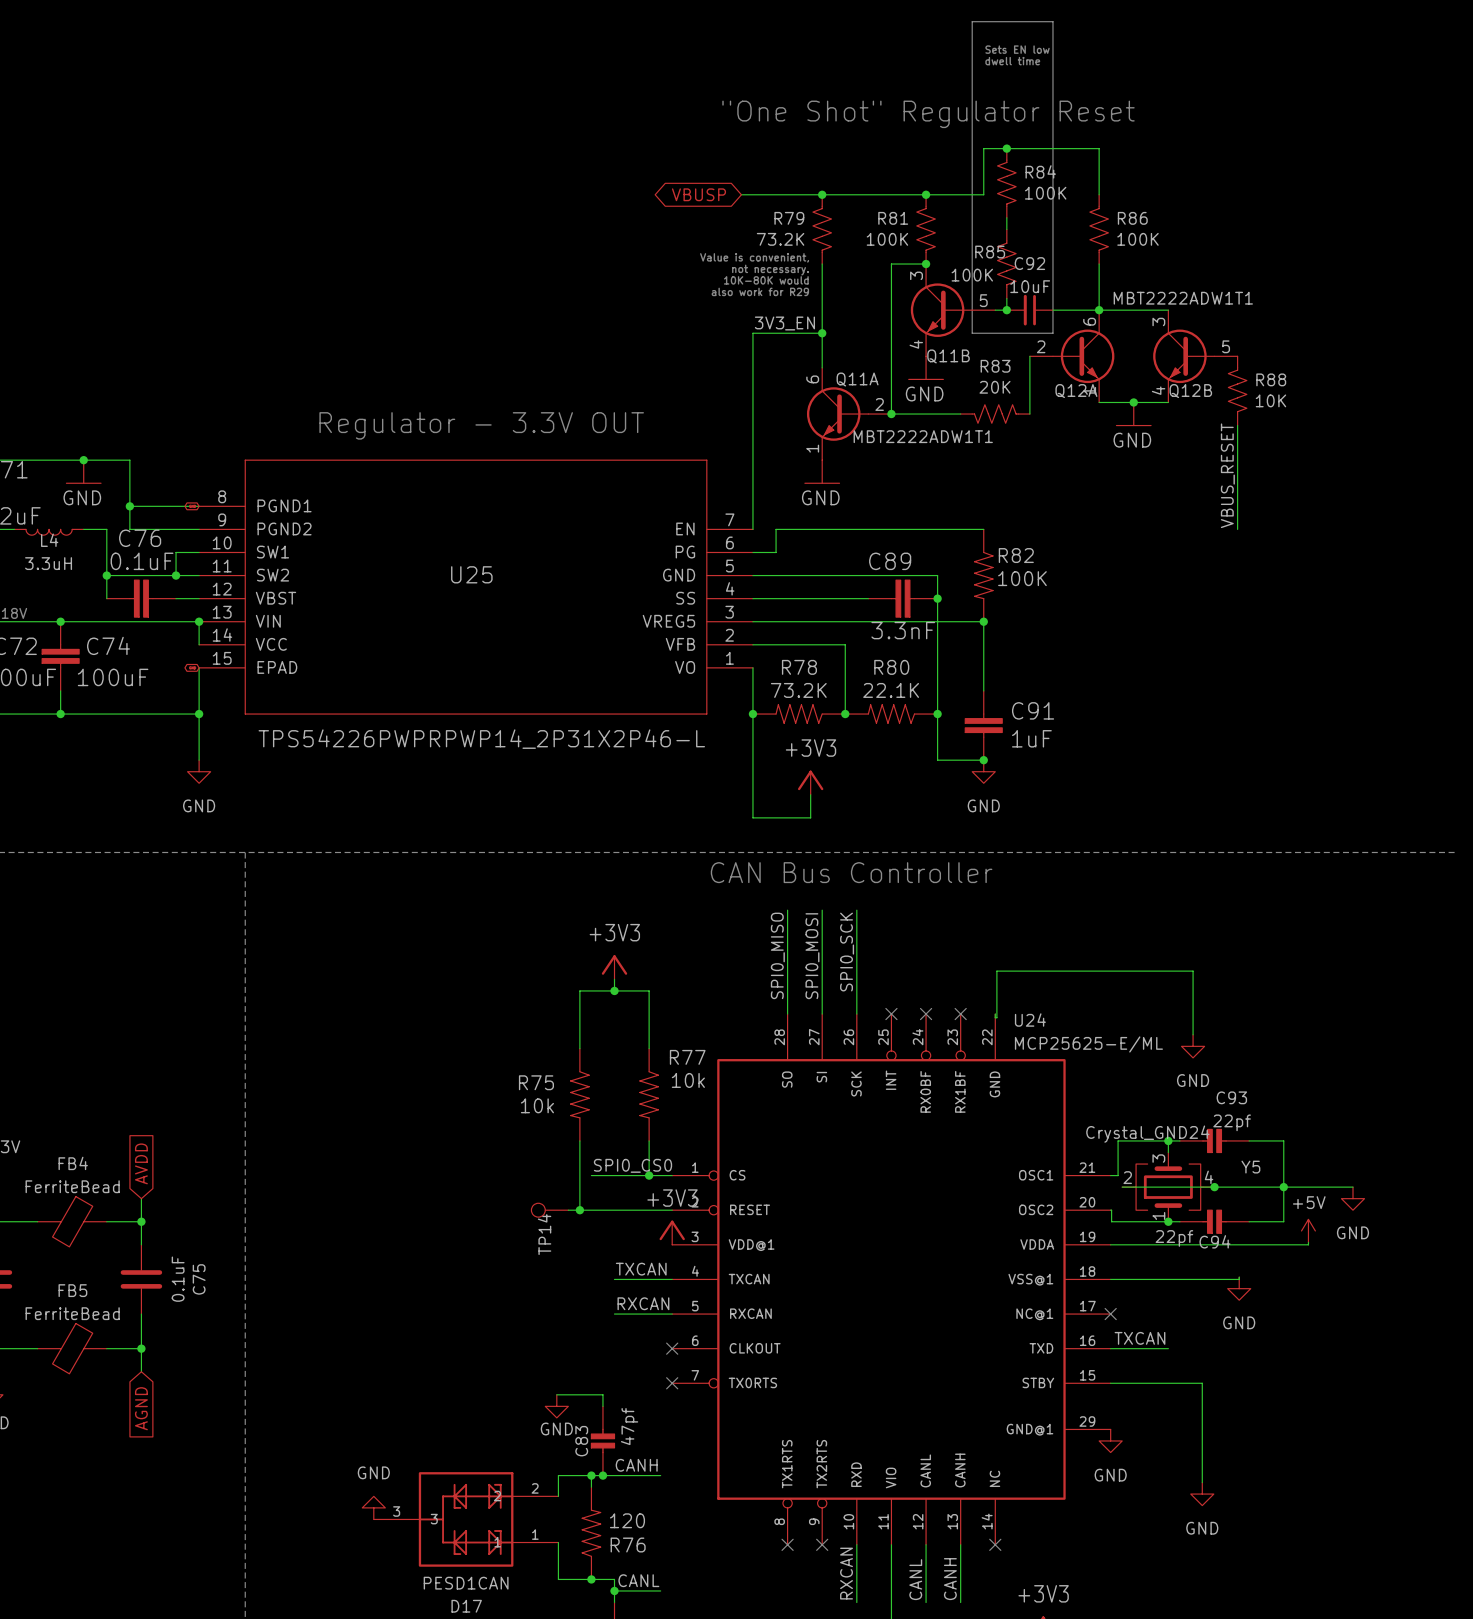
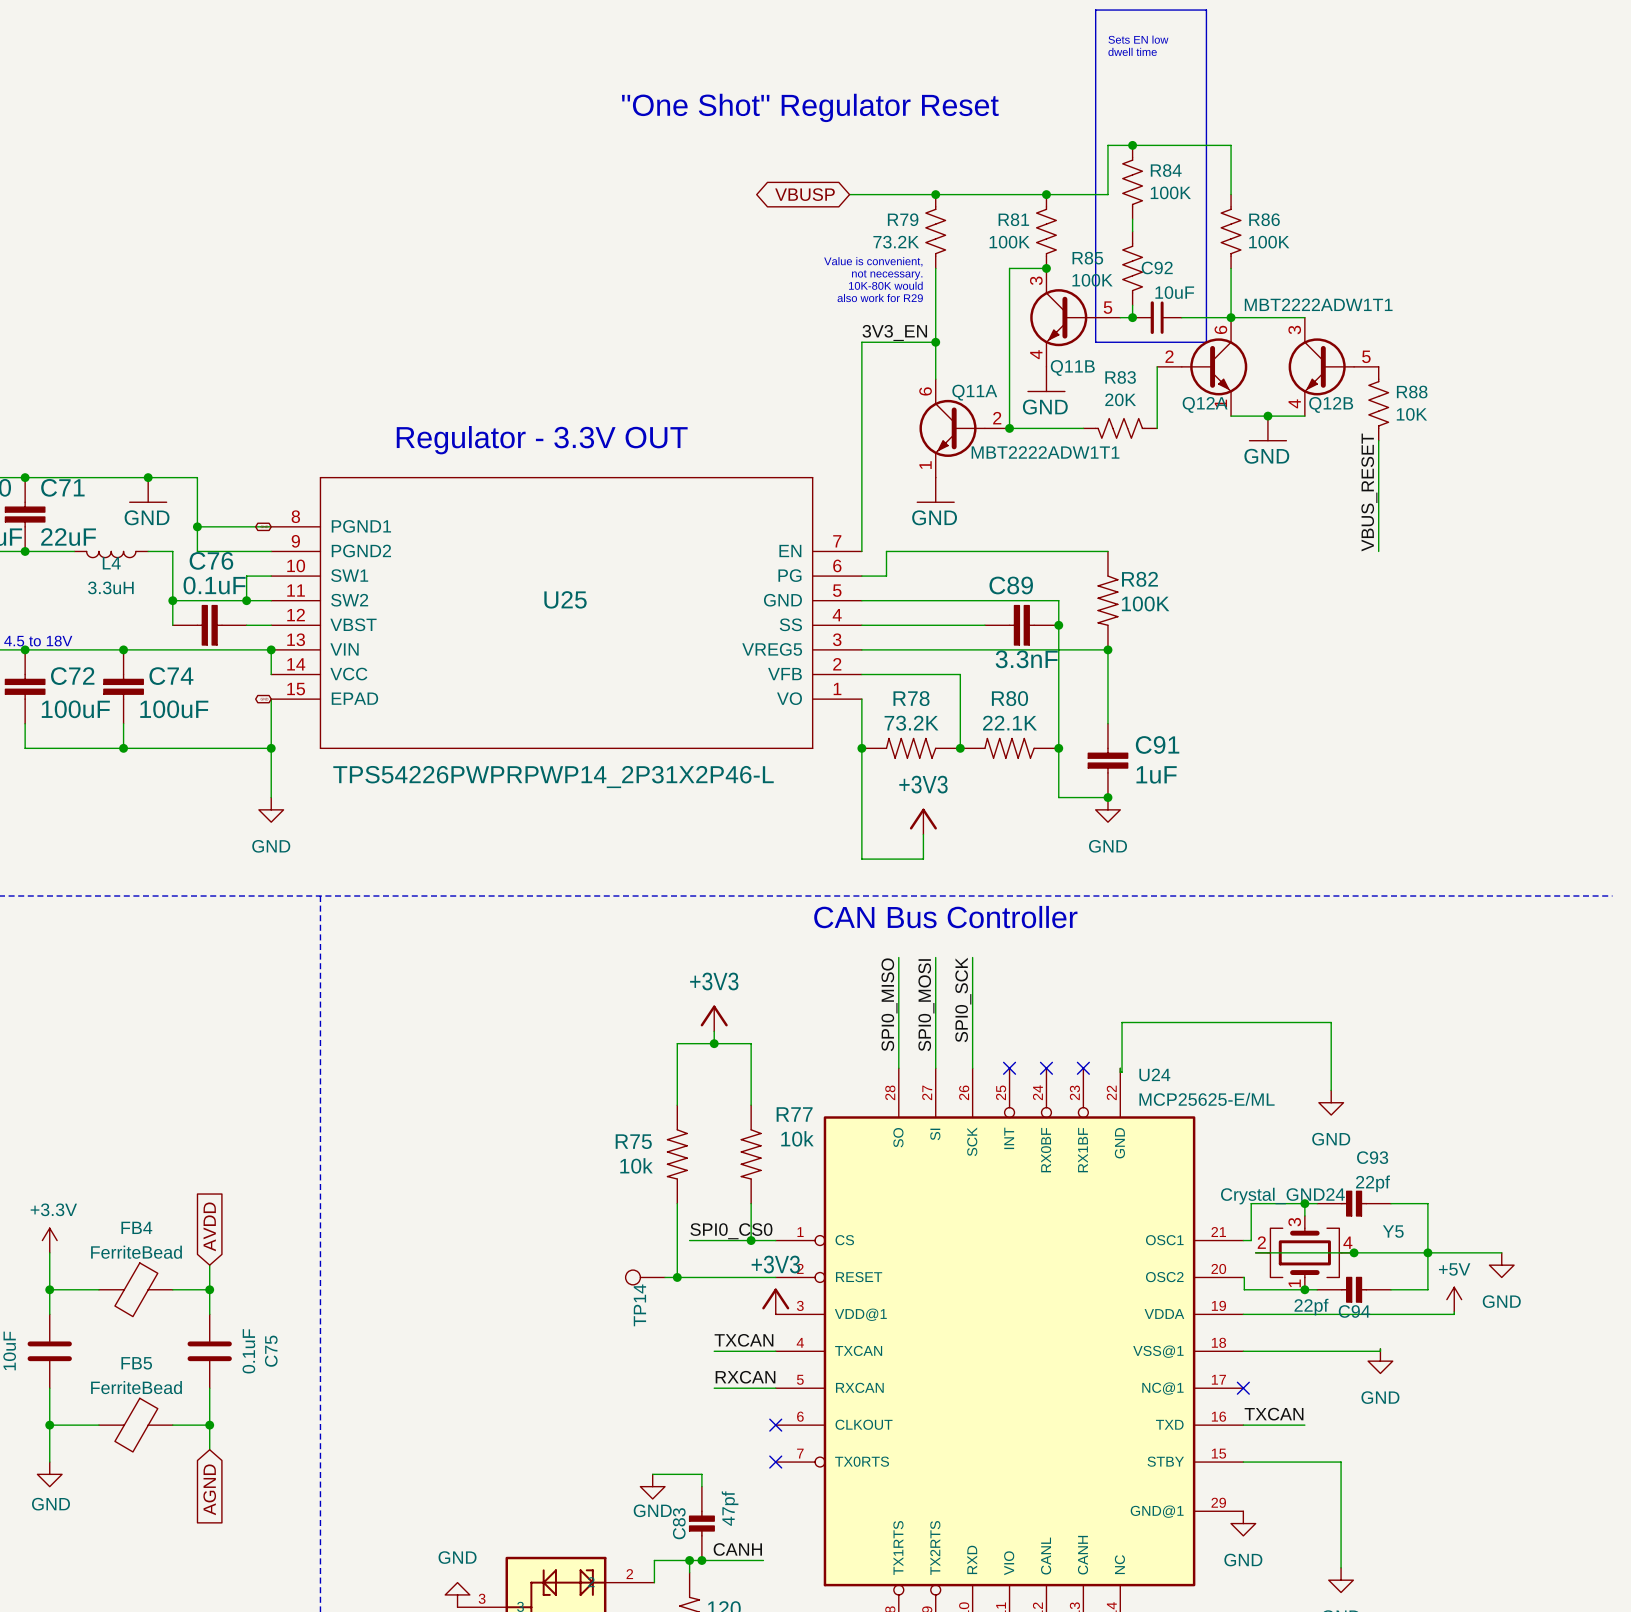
line: (1052, 21) (1052, 333) -> (1181, 10) (1206, 10) (1206, 342) (1181, 342)
text position: "One Shot" Regulator Reset (928, 114) -> "One Shot" Regulator Reset (810, 107)
R85 name position: R85 (990, 252) -> R85 (1087, 258)
C92 value position: 10uF (1030, 286) -> 10uF (1174, 292)

